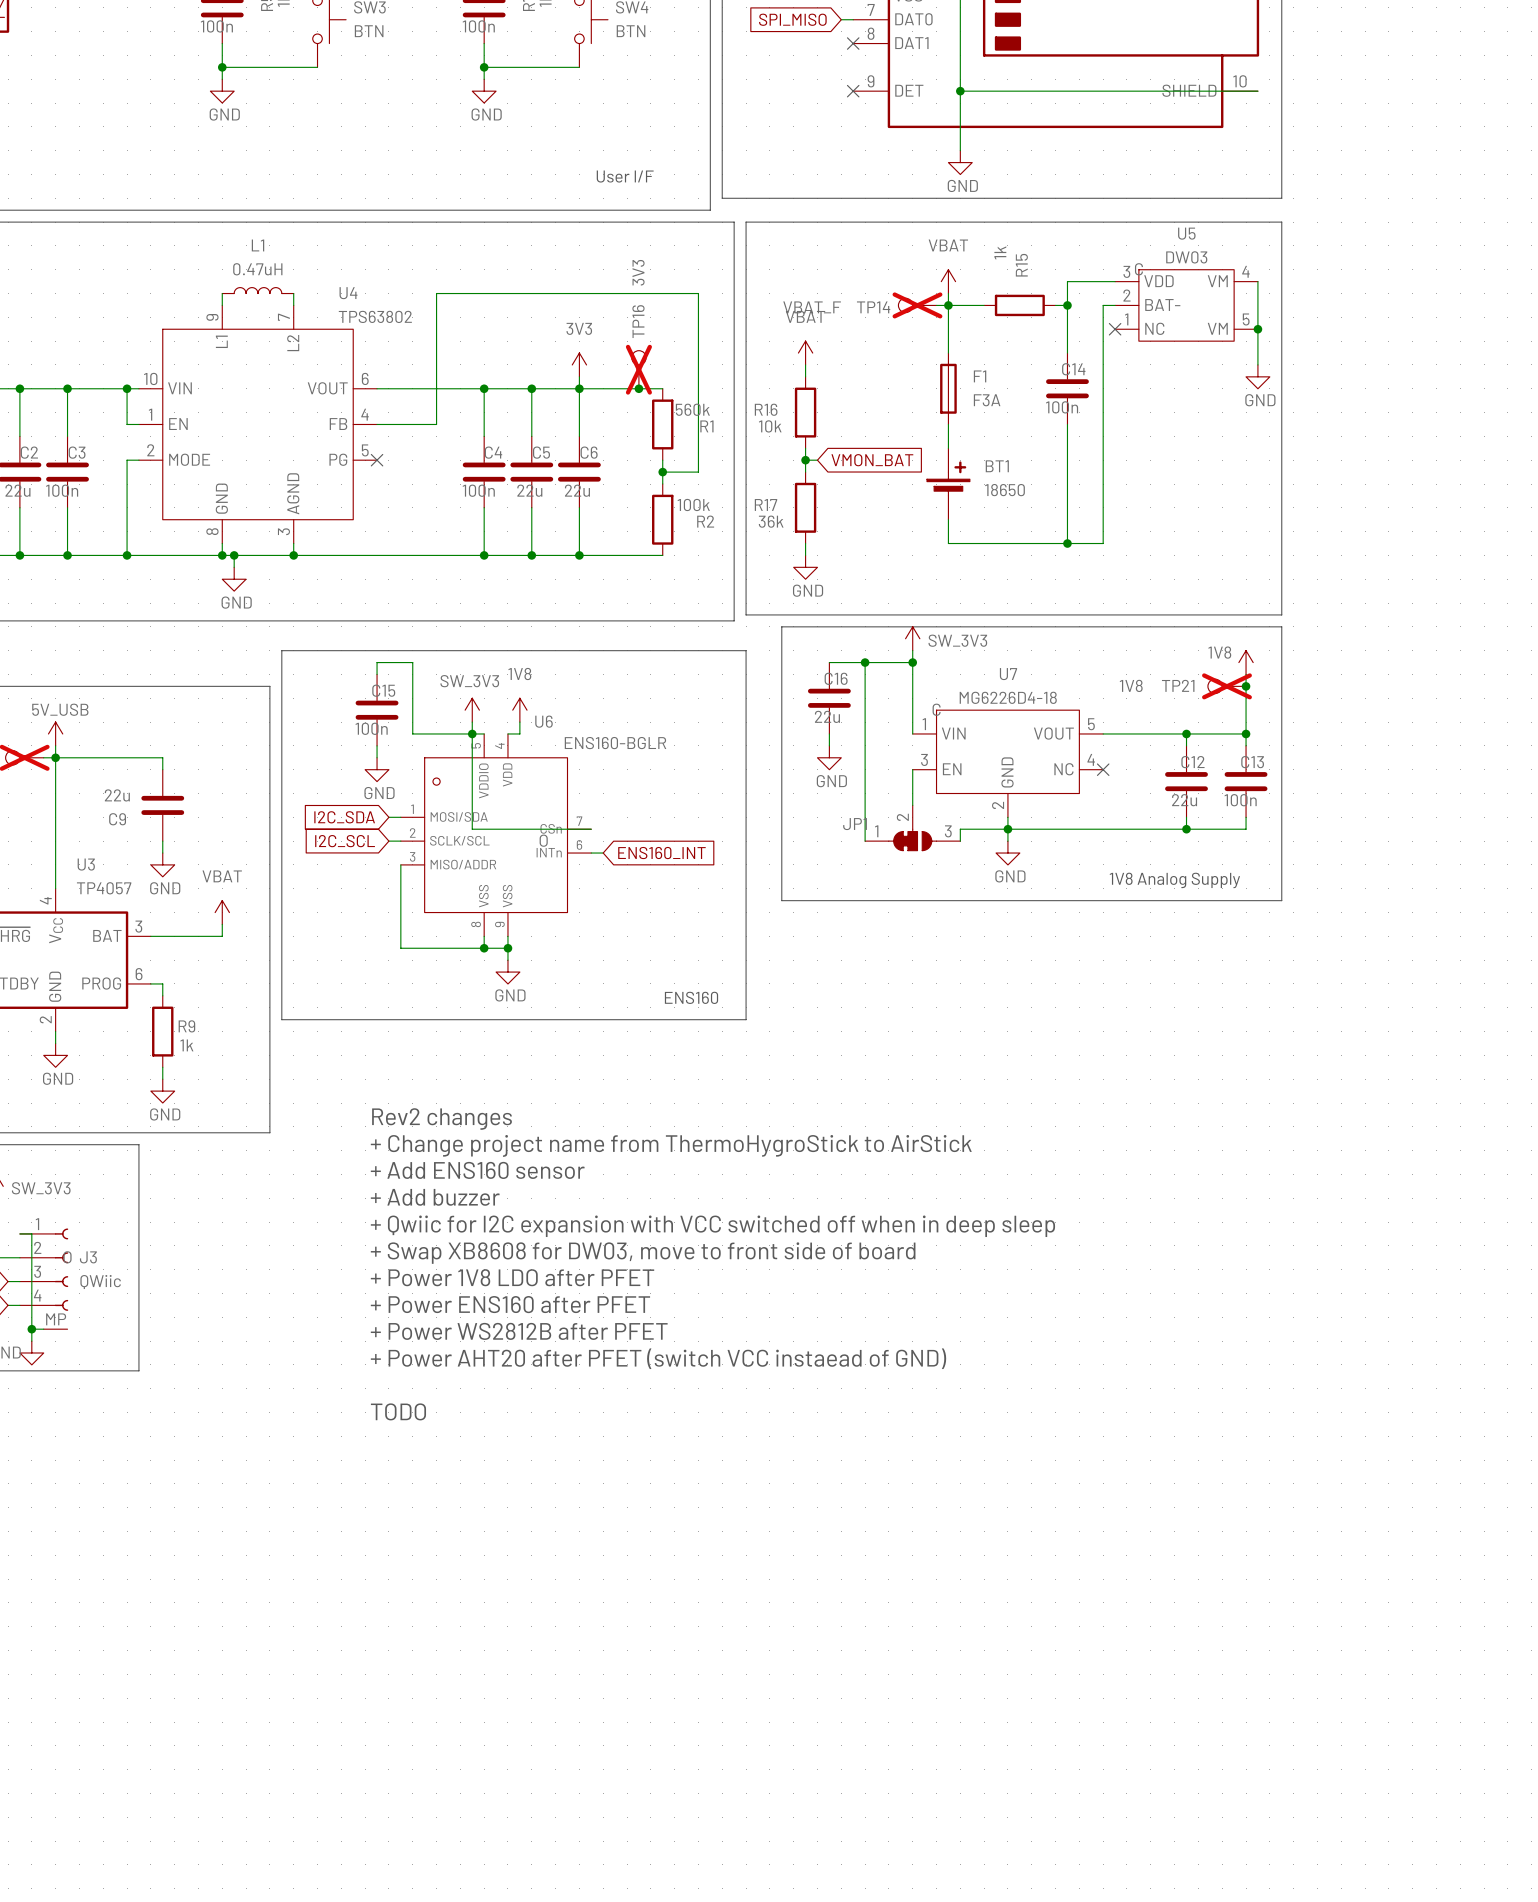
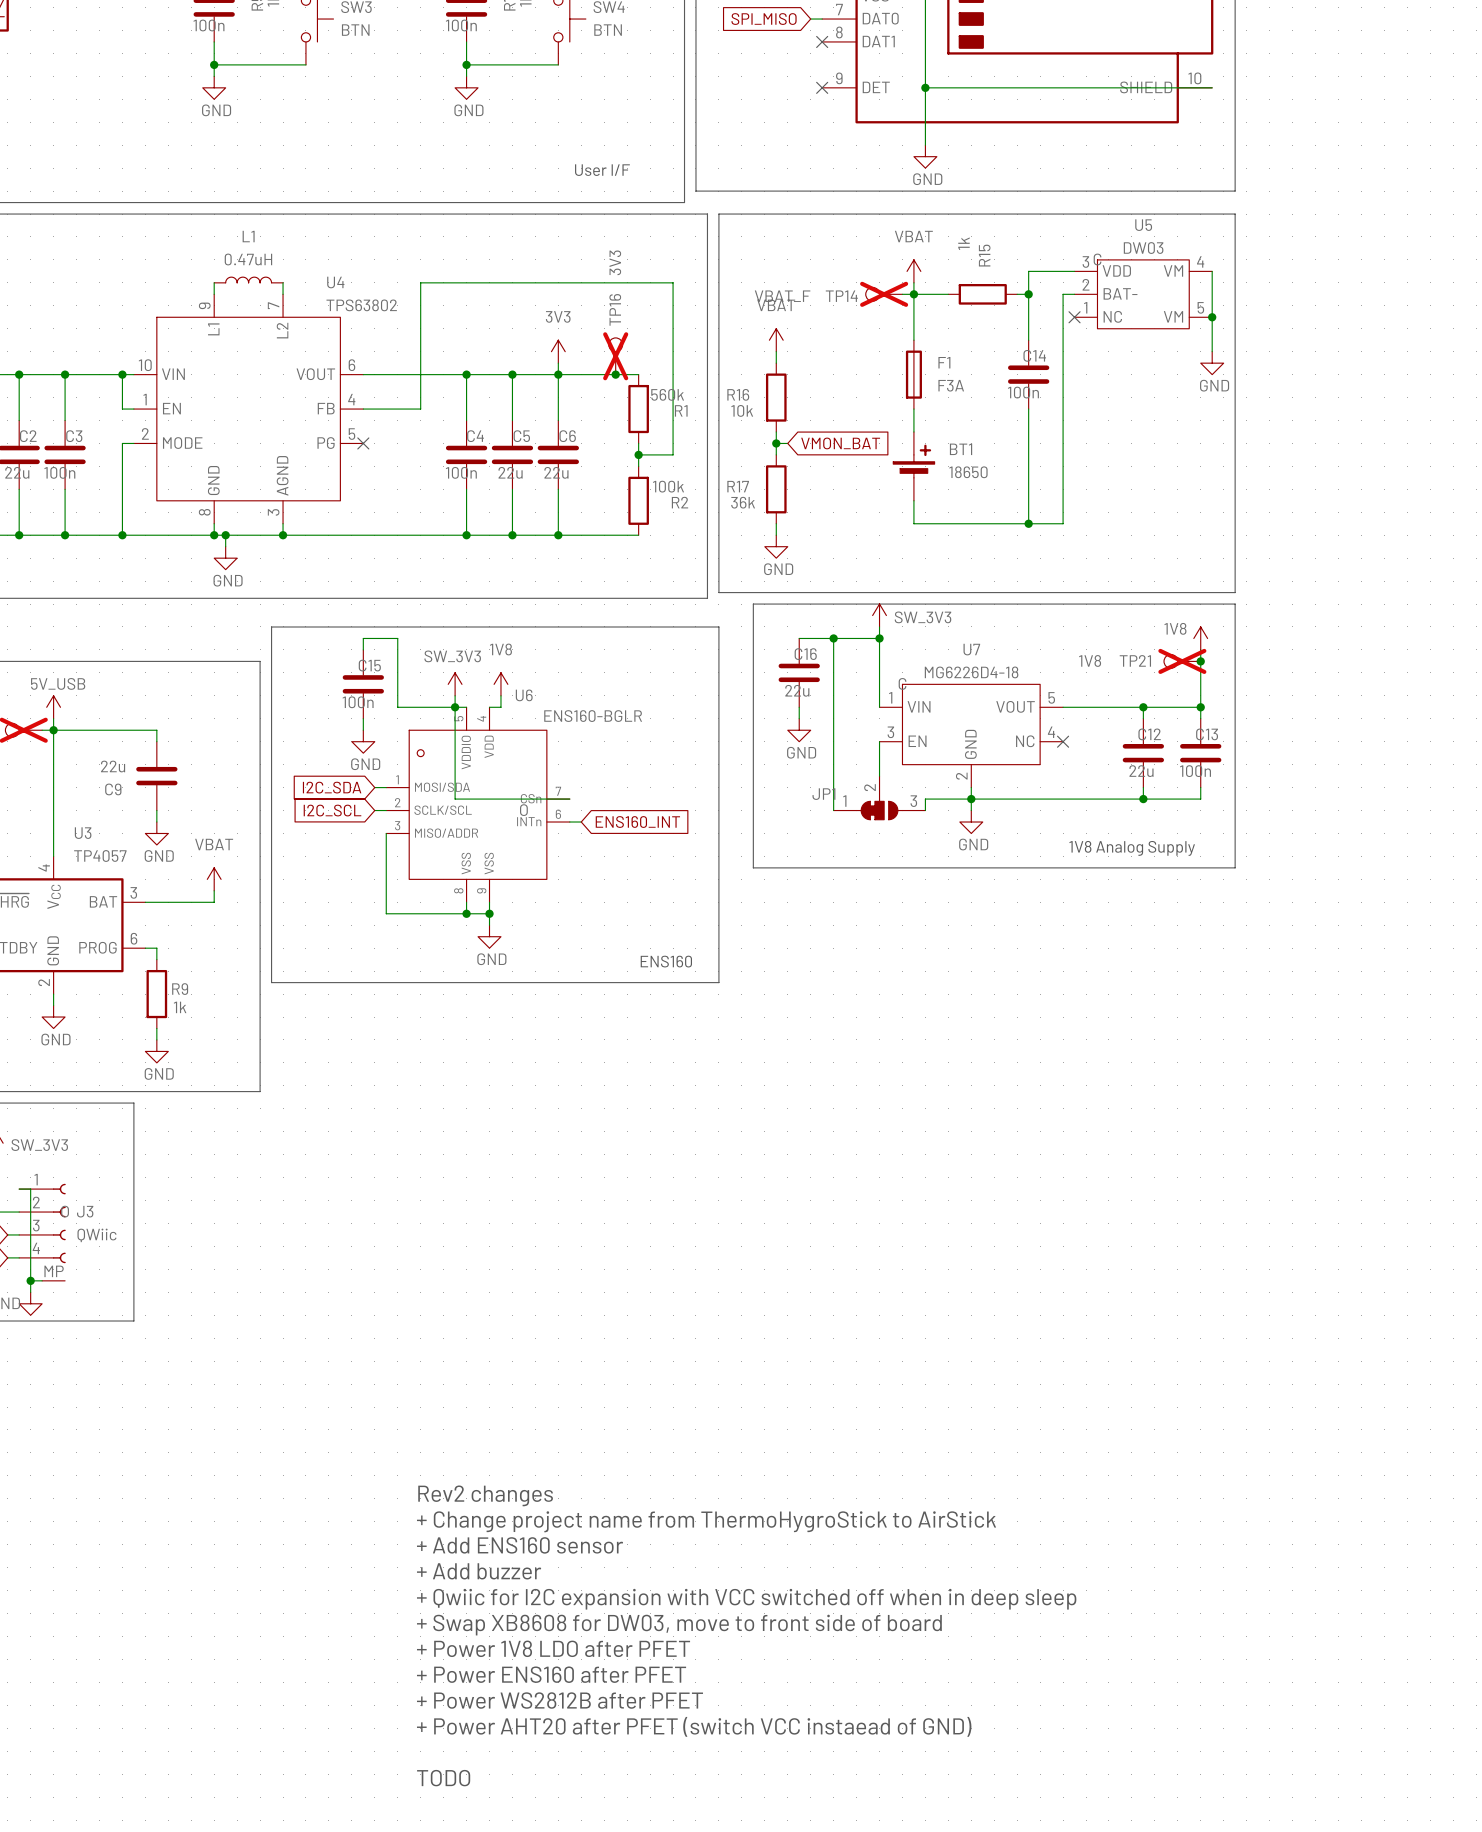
text: Rev2 changes (442, 1119) -> none
text: + Change project name from ThermoHygroStick to AirStick (671, 1145) -> none
text: + Add ENS160 sensor (477, 1170) -> none
text: + Add buzzer (435, 1197) -> none
text: + Qwiic for I2C expansion with VCC switched off when in deep sleep (712, 1226) -> none
text: + Swap XB8608 for DW03, move to front side of board (643, 1253) -> none
text: + Power 1V8 LDO after PFET (512, 1277) -> none
text: + Power ENS160 after PFET (510, 1304) -> none
text: + Power WS2812B after PFET (519, 1331) -> none
text: + Power AHT20 after PFET (switch VCC instaead of GND) (658, 1358) -> none
text: TODO (398, 1411) -> none
text: none -> Rev2 changes (485, 1495)
text: none -> + Change project name from ThermoHygroStick to AirStick (706, 1521)
text: none -> + Add ENS160 sensor (520, 1545)
text: none -> + Add buzzer (479, 1571)
text: none -> + Qwiic for I2C expansion with VCC switched off when in deep sleep (746, 1599)
text: none -> + Swap XB8608 for DW03, move to front side of board (679, 1625)
text: none -> + Power 1V8 LDO after PFET (553, 1648)
text: none -> + Power ENS160 after PFET (551, 1674)
text: none -> + Power WS2812B after PFET (560, 1700)
text: none -> + Power AHT20 after PFET (switch VCC instaead of GND) (694, 1726)
text: none -> TODO (443, 1778)

